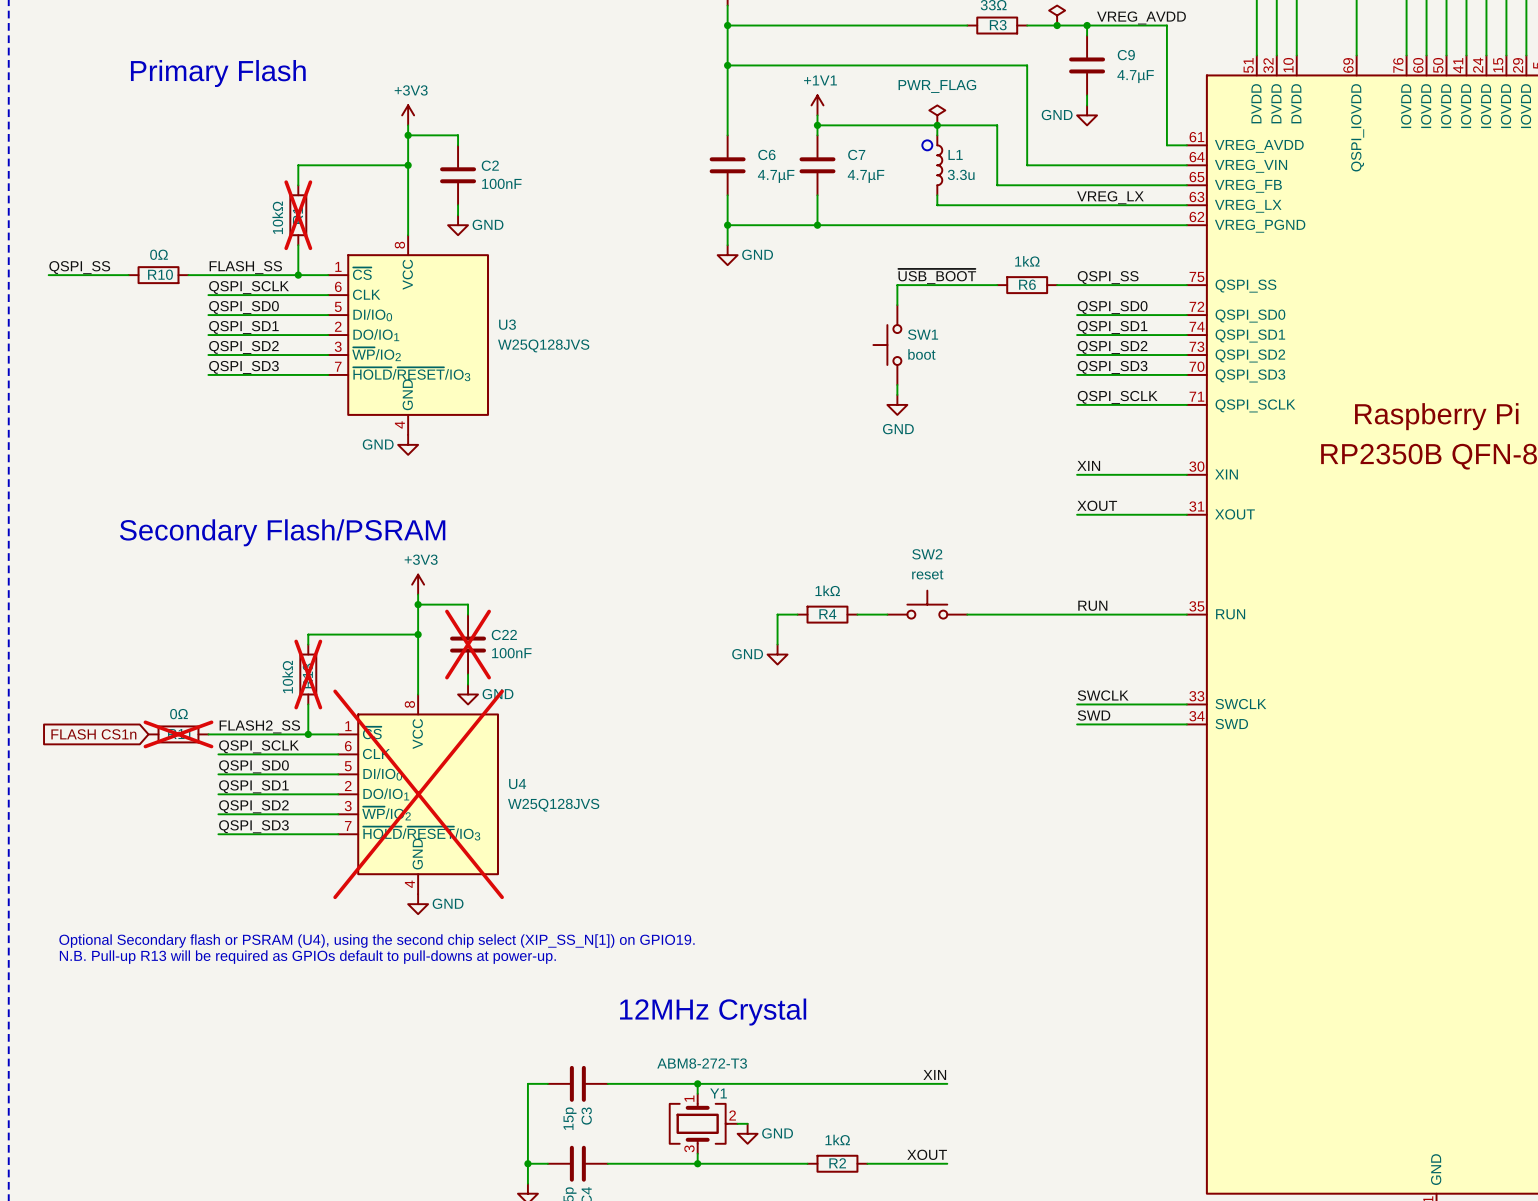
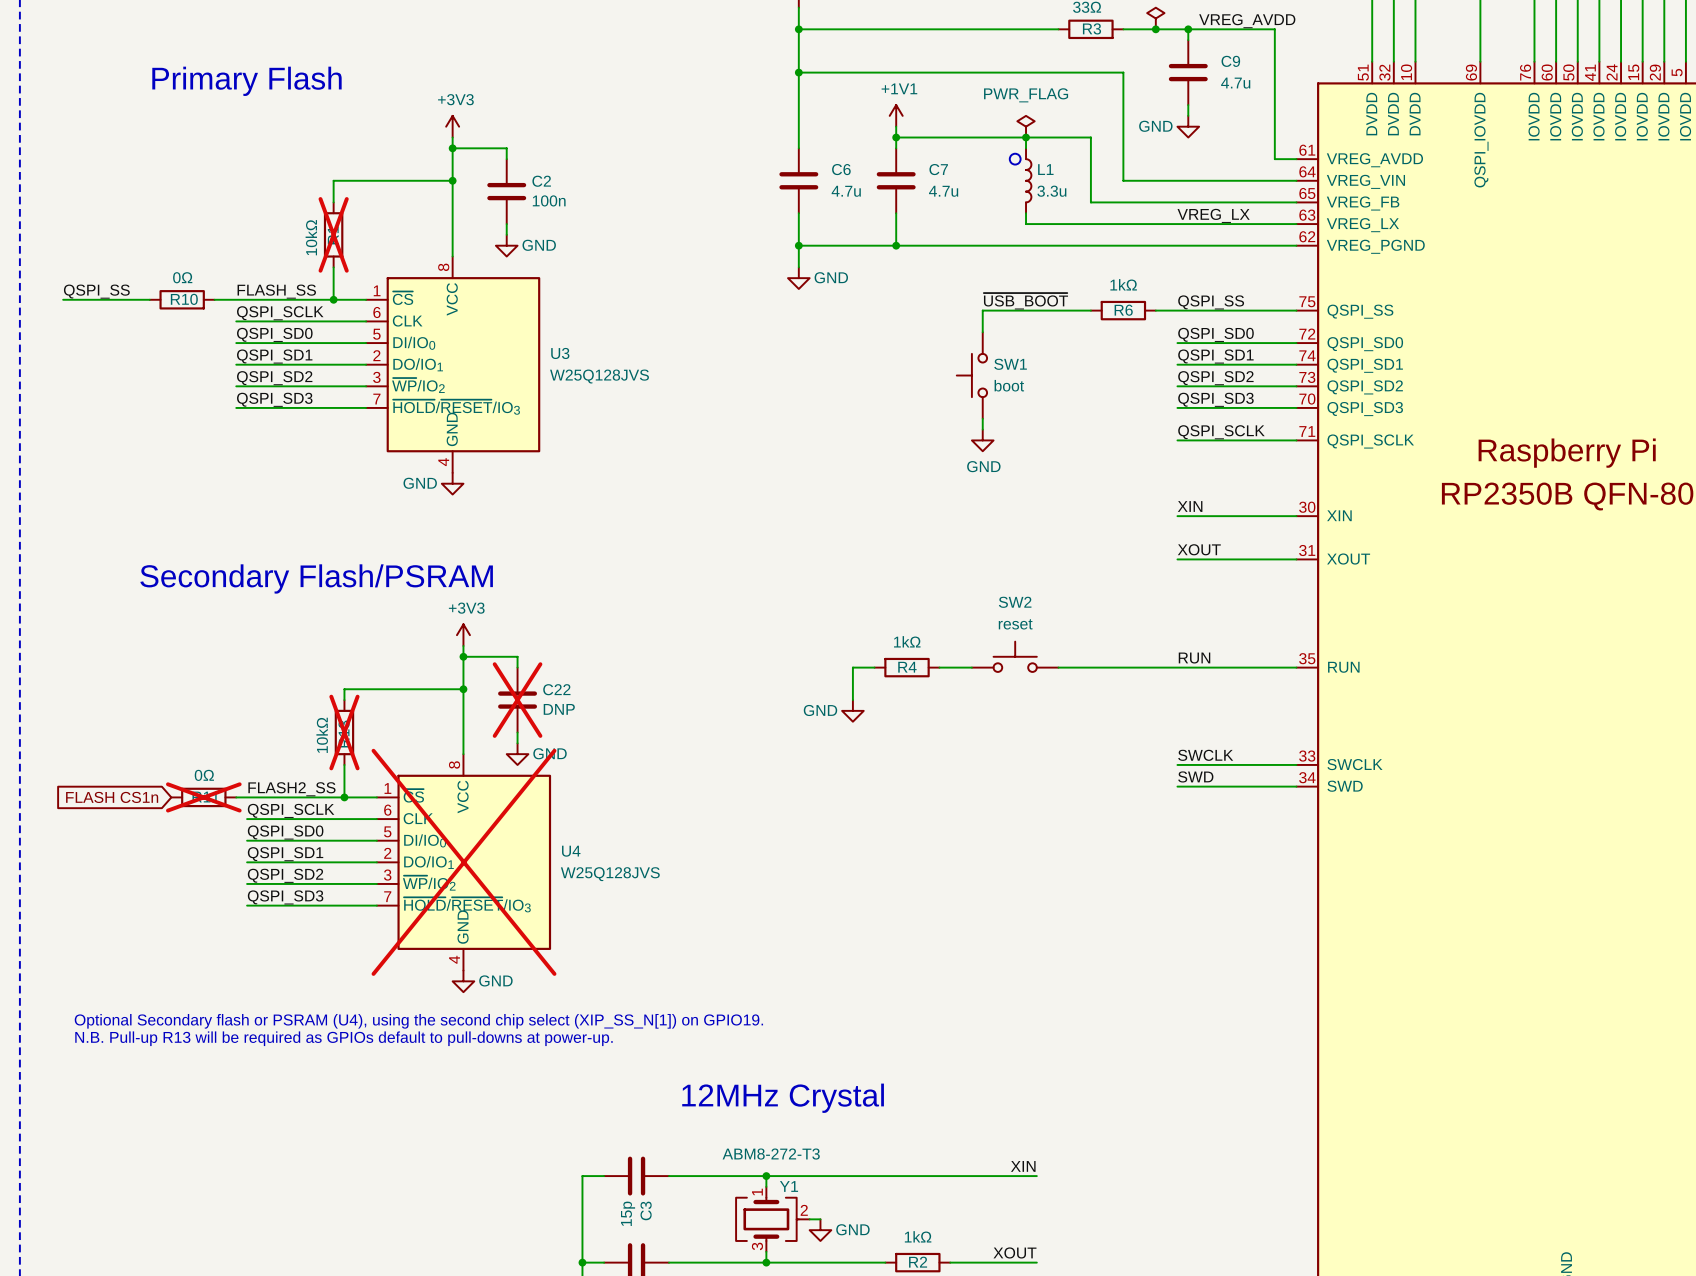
C9 value: 4.7µF (1135, 76) -> 4.7u (1235, 83)
C6 value: 4.7µF (776, 176) -> 4.7u (846, 191)
C7 value: 4.7µF (866, 176) -> 4.7u (943, 191)
C2 value: 100nF (501, 183) -> 100n (549, 200)
C22 value: 100nF (511, 653) -> DNP (559, 709)

